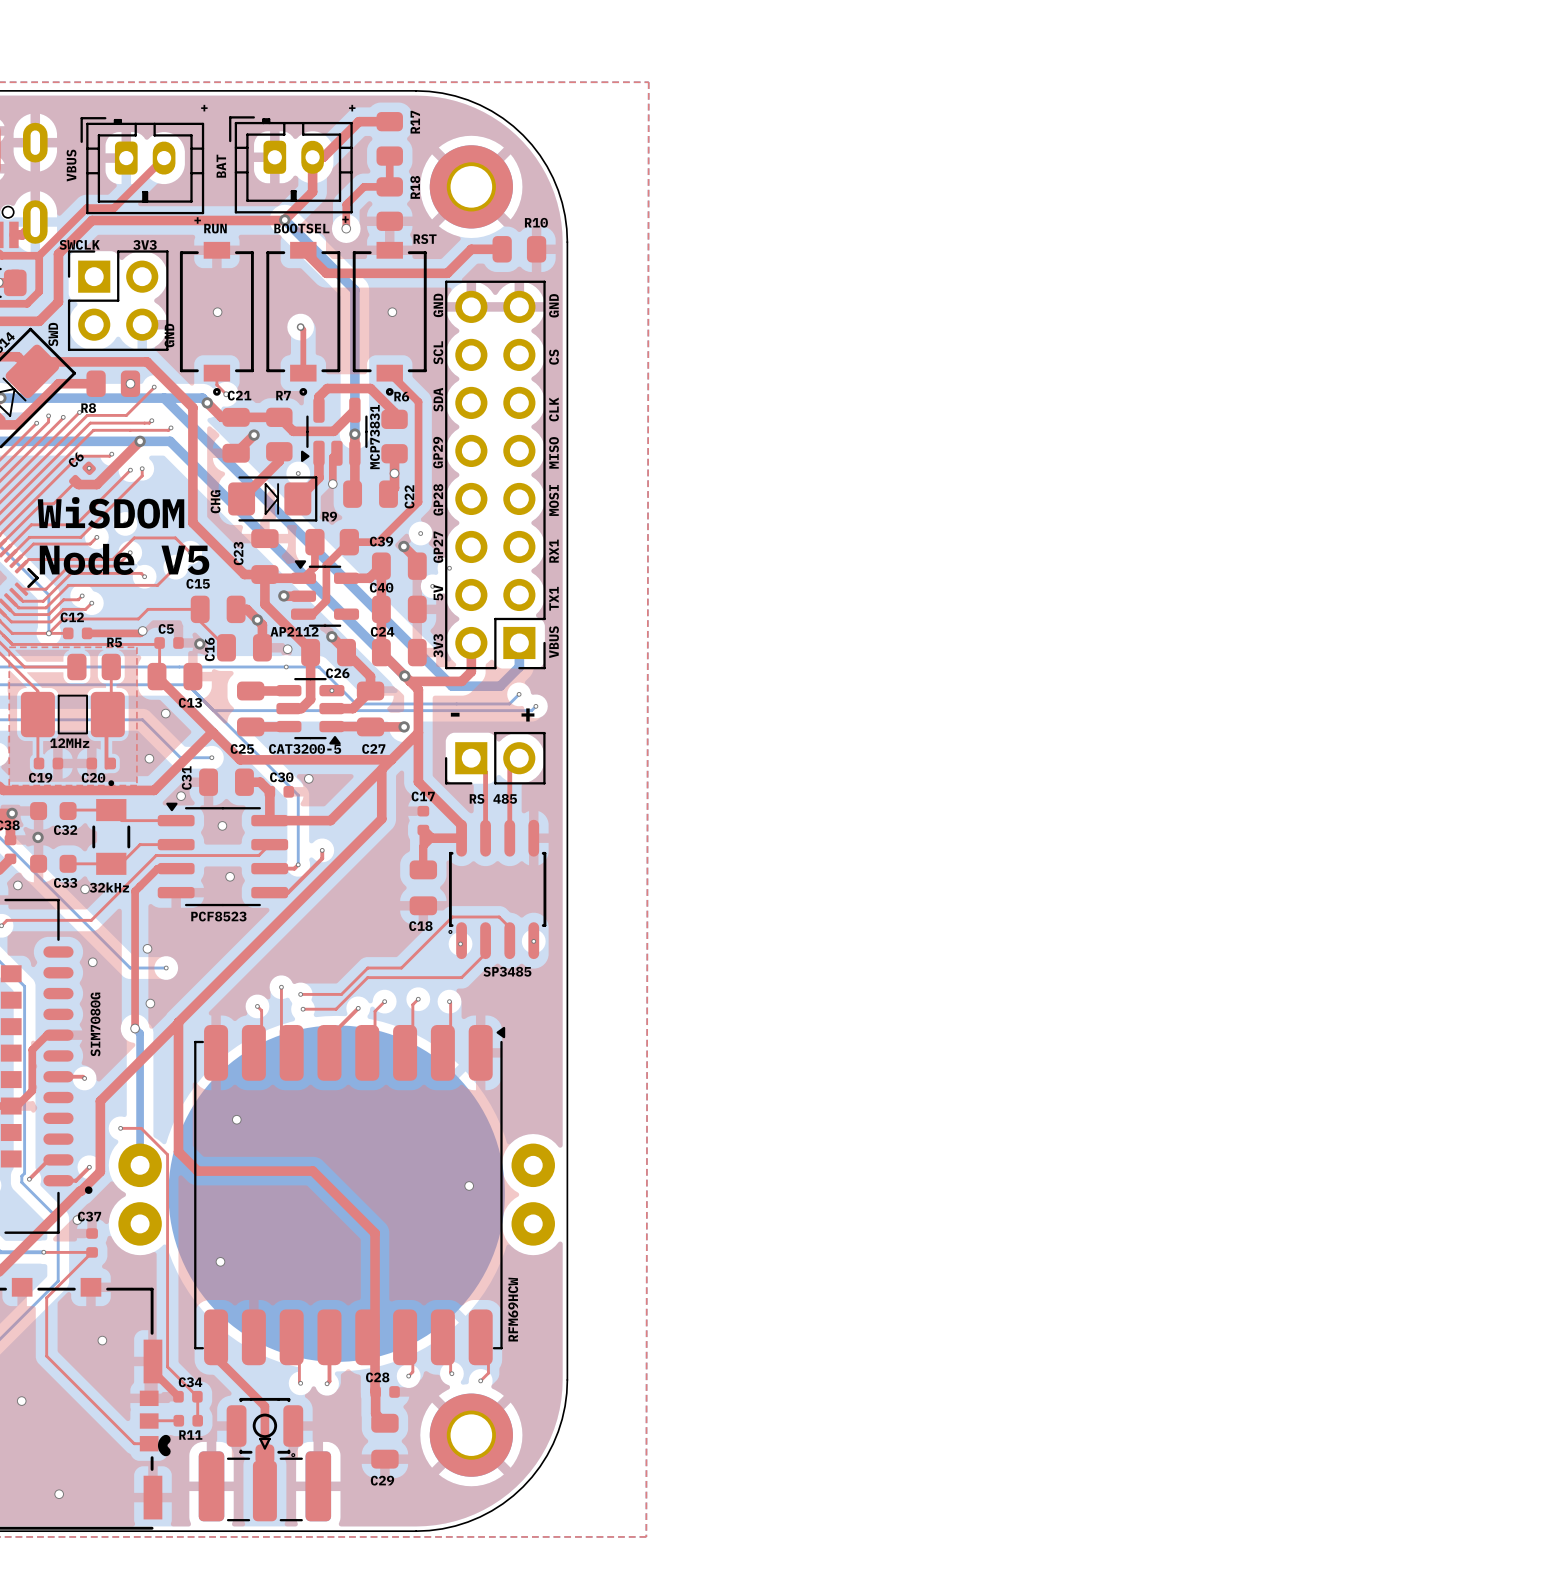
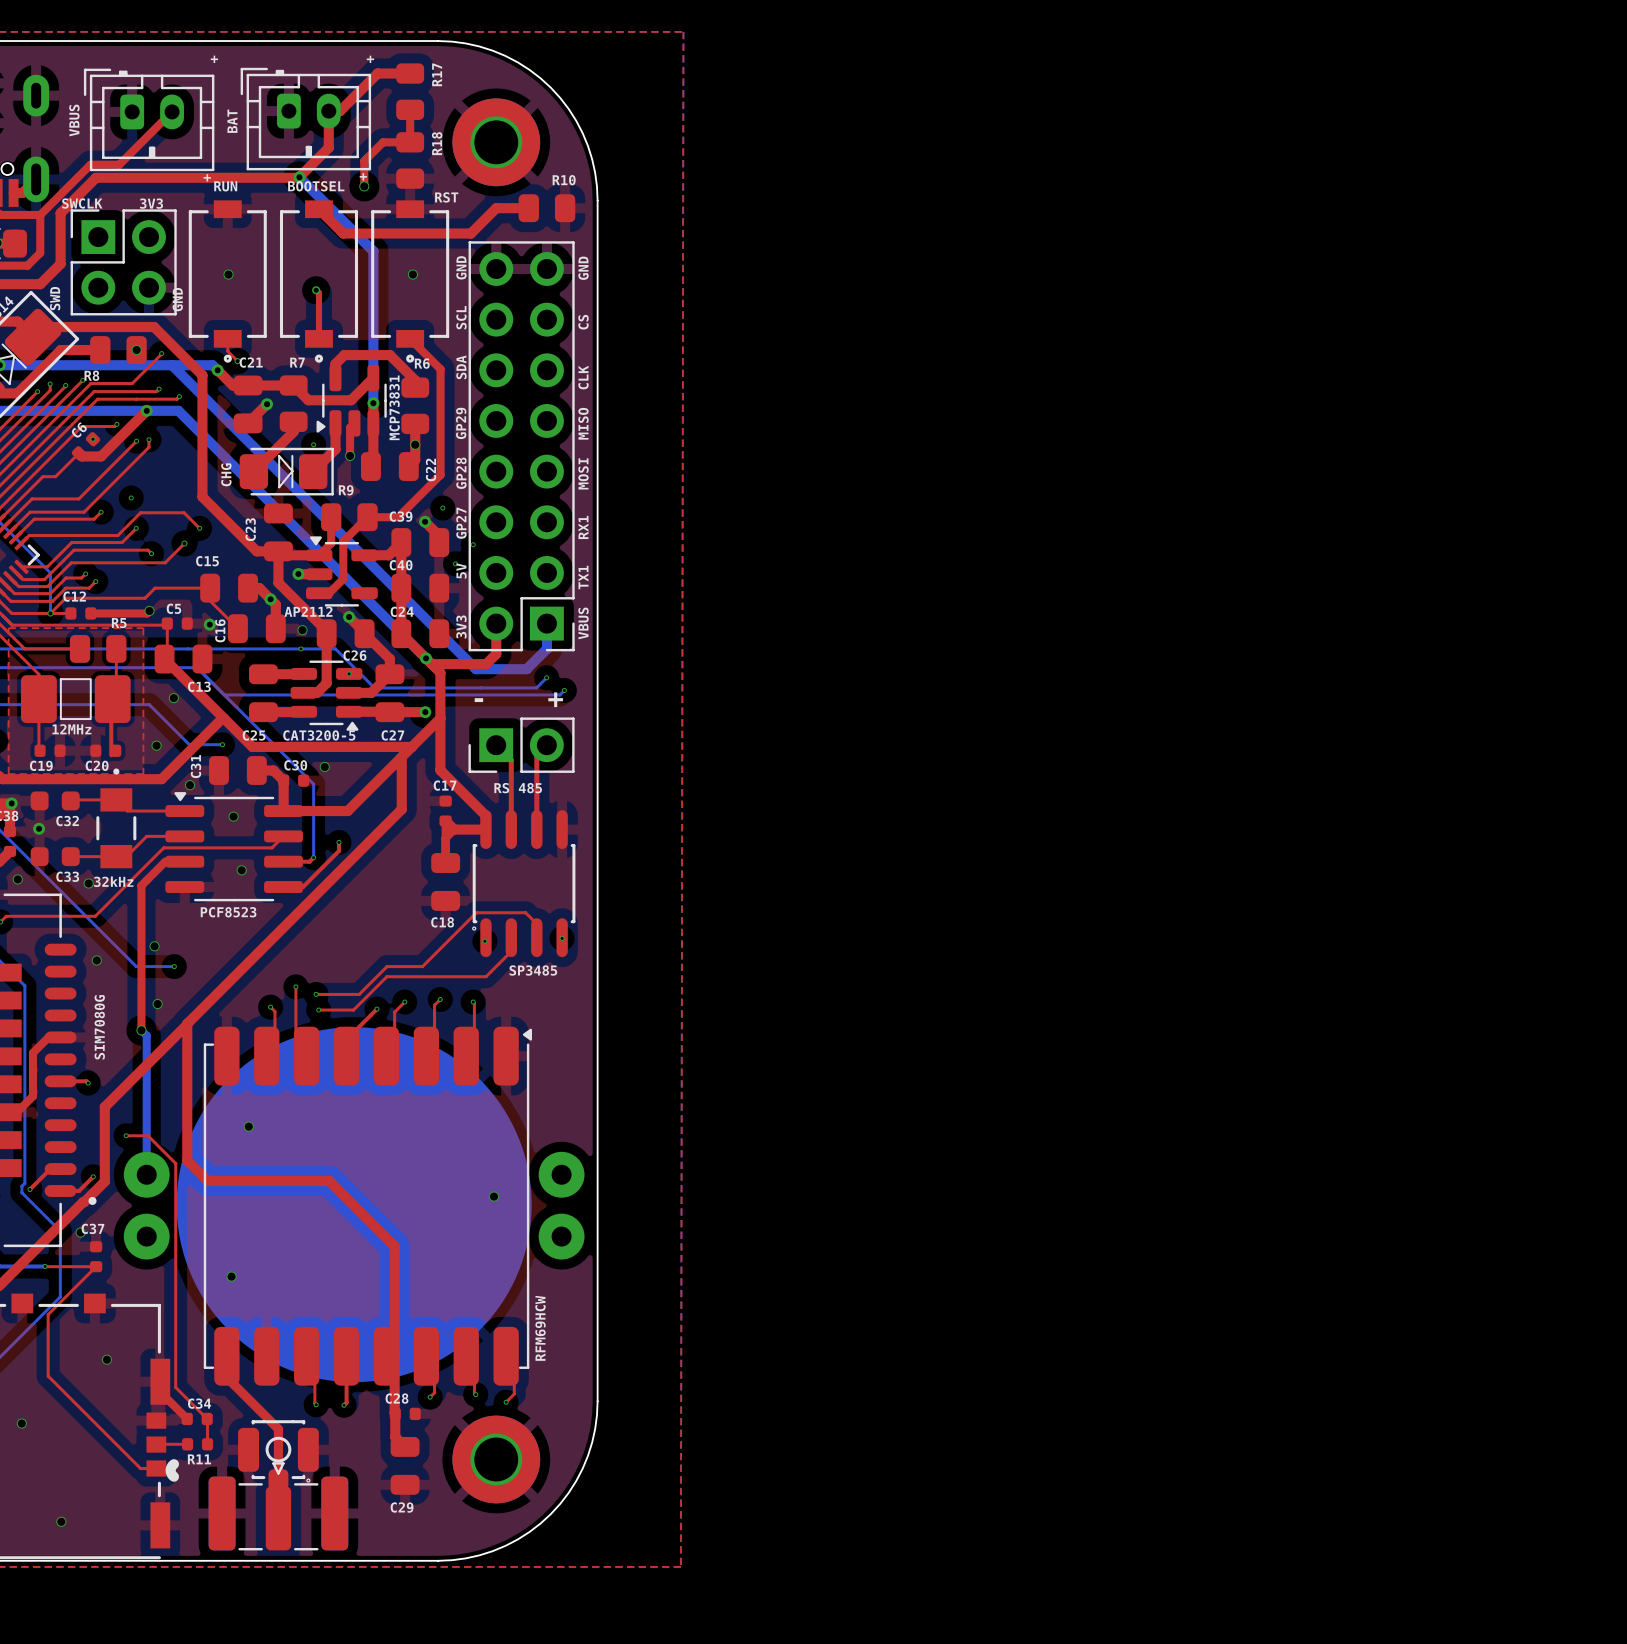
text: WiSDOM (110, 512) -> none
text: Node V5 (124, 559) -> none

